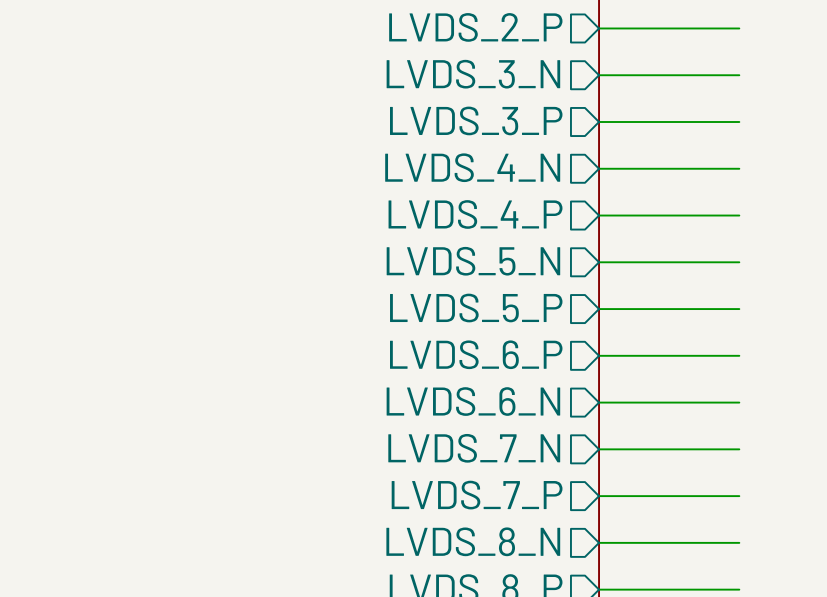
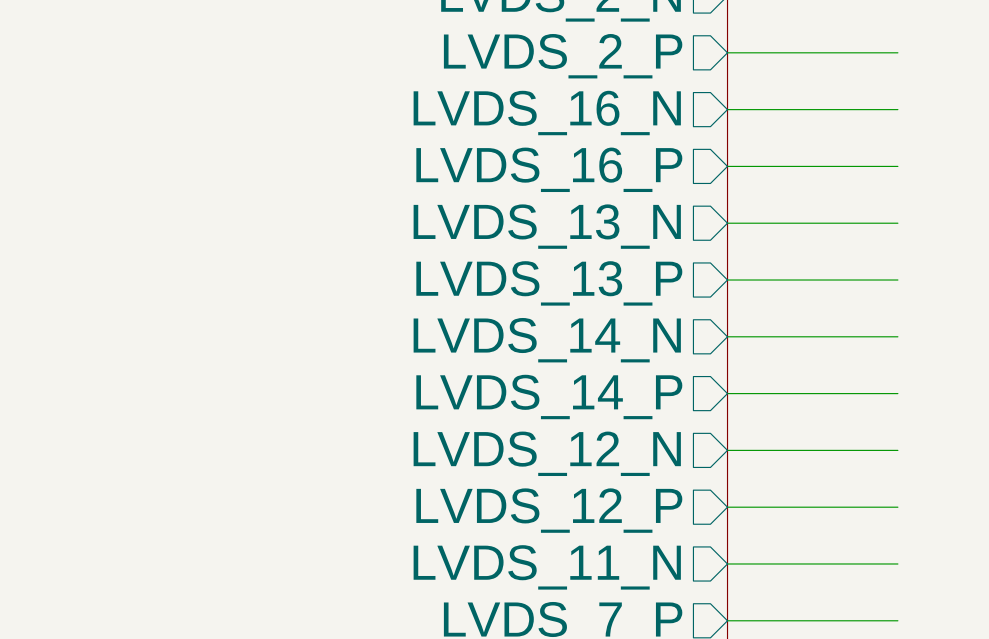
sheet pin: LVDS_3_N (473, 74) -> LVDS_16_N (547, 113)
sheet pin: LVDS_3_P (476, 120) -> LVDS_16_P (549, 169)
sheet pin: LVDS_4_N (472, 167) -> LVDS_13_N (547, 226)
sheet pin: LVDS_4_P (475, 214) -> LVDS_13_P (549, 283)
sheet pin: LVDS_5_N (473, 261) -> LVDS_14_N (547, 340)
sheet pin: LVDS_5_P (476, 308) -> LVDS_14_P (549, 396)
sheet pin: LVDS_6_P (476, 354) -> LVDS_12_N (547, 453)
sheet pin: LVDS_6_N (473, 401) -> LVDS_12_P (549, 510)
sheet pin: LVDS_7_N (474, 448) -> LVDS_11_N (547, 567)

